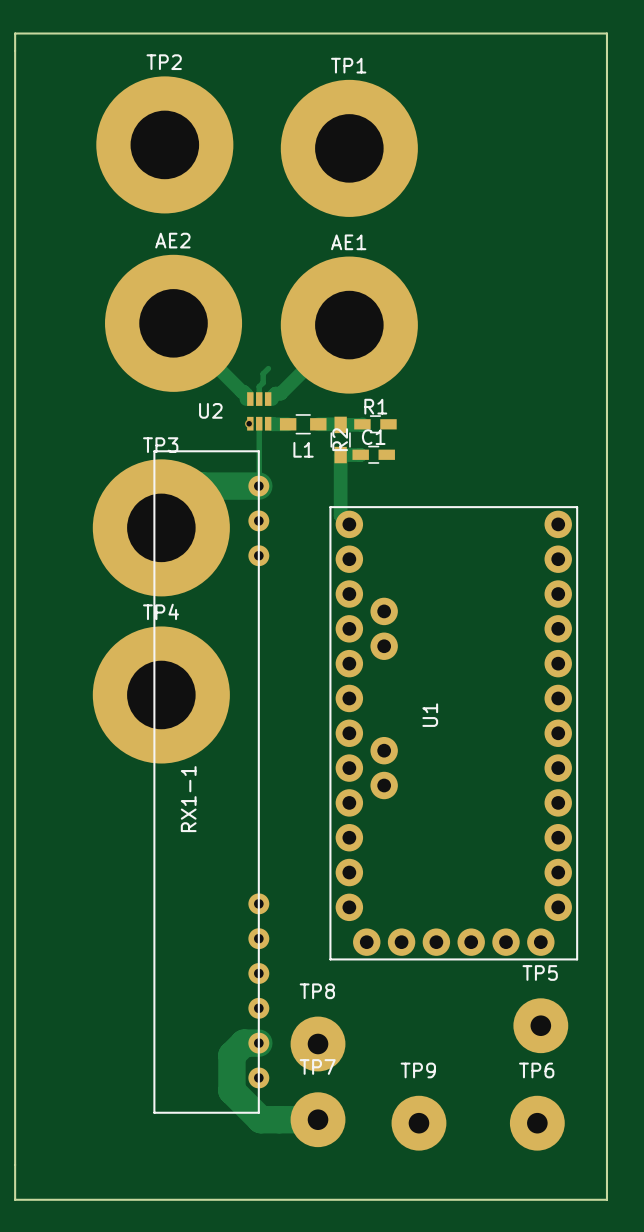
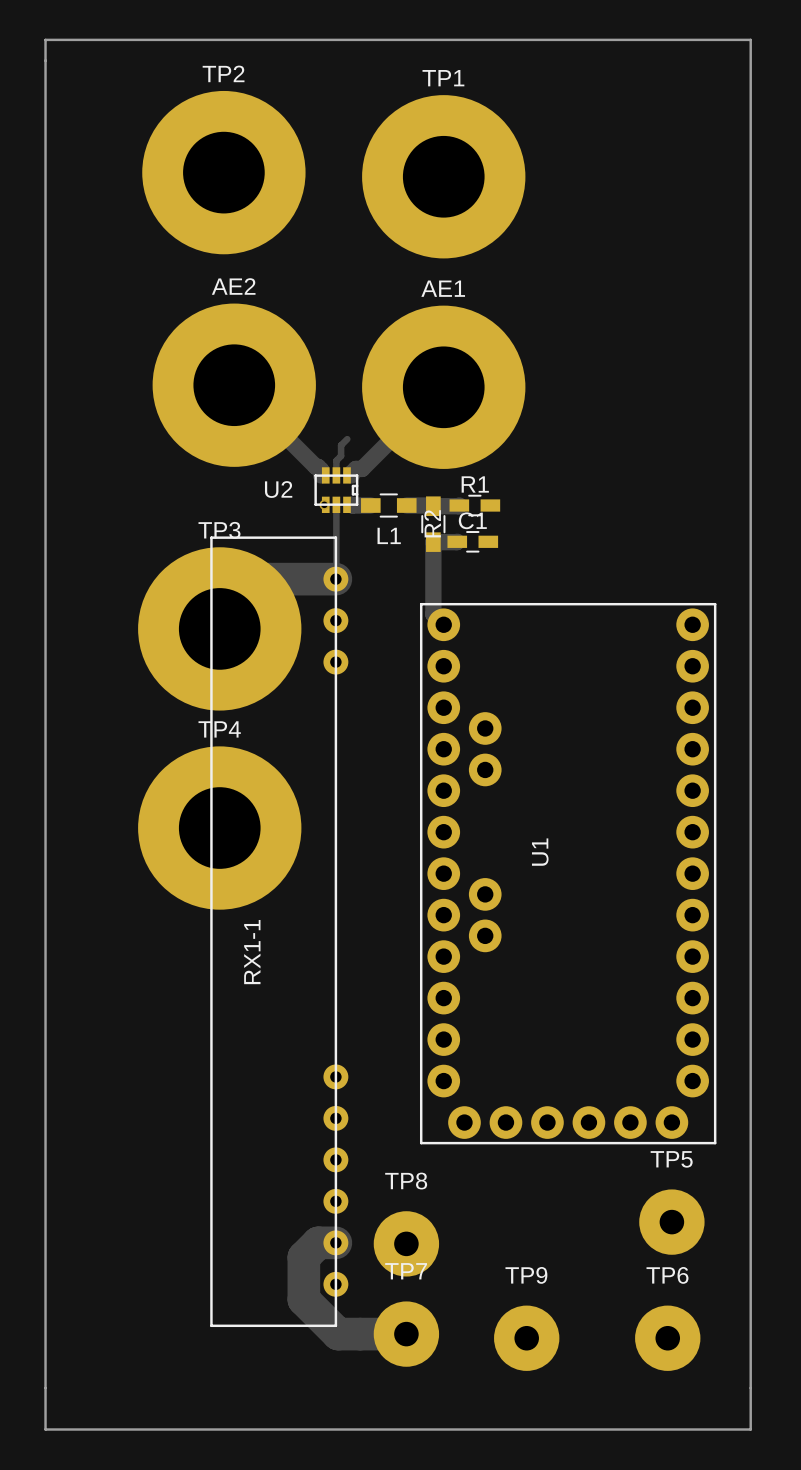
U2 footprint: [247, 392, 272, 431] -> [314, 467, 359, 513]

